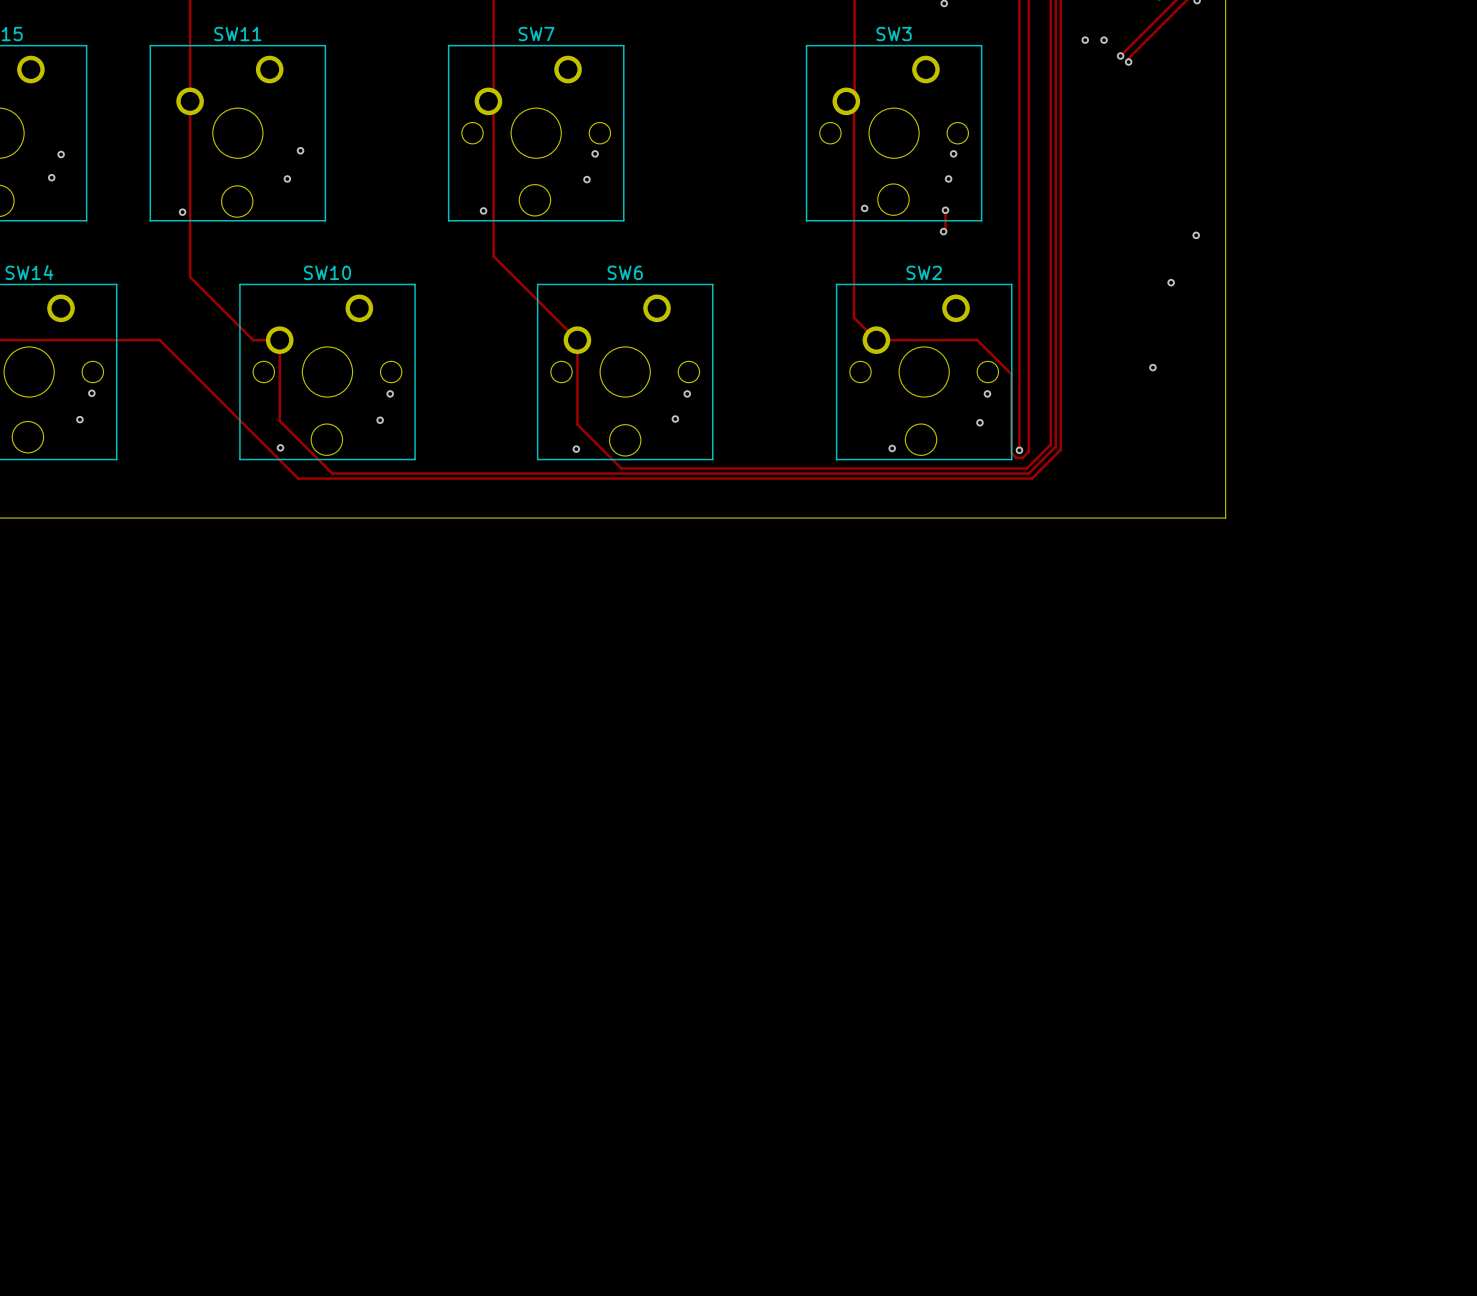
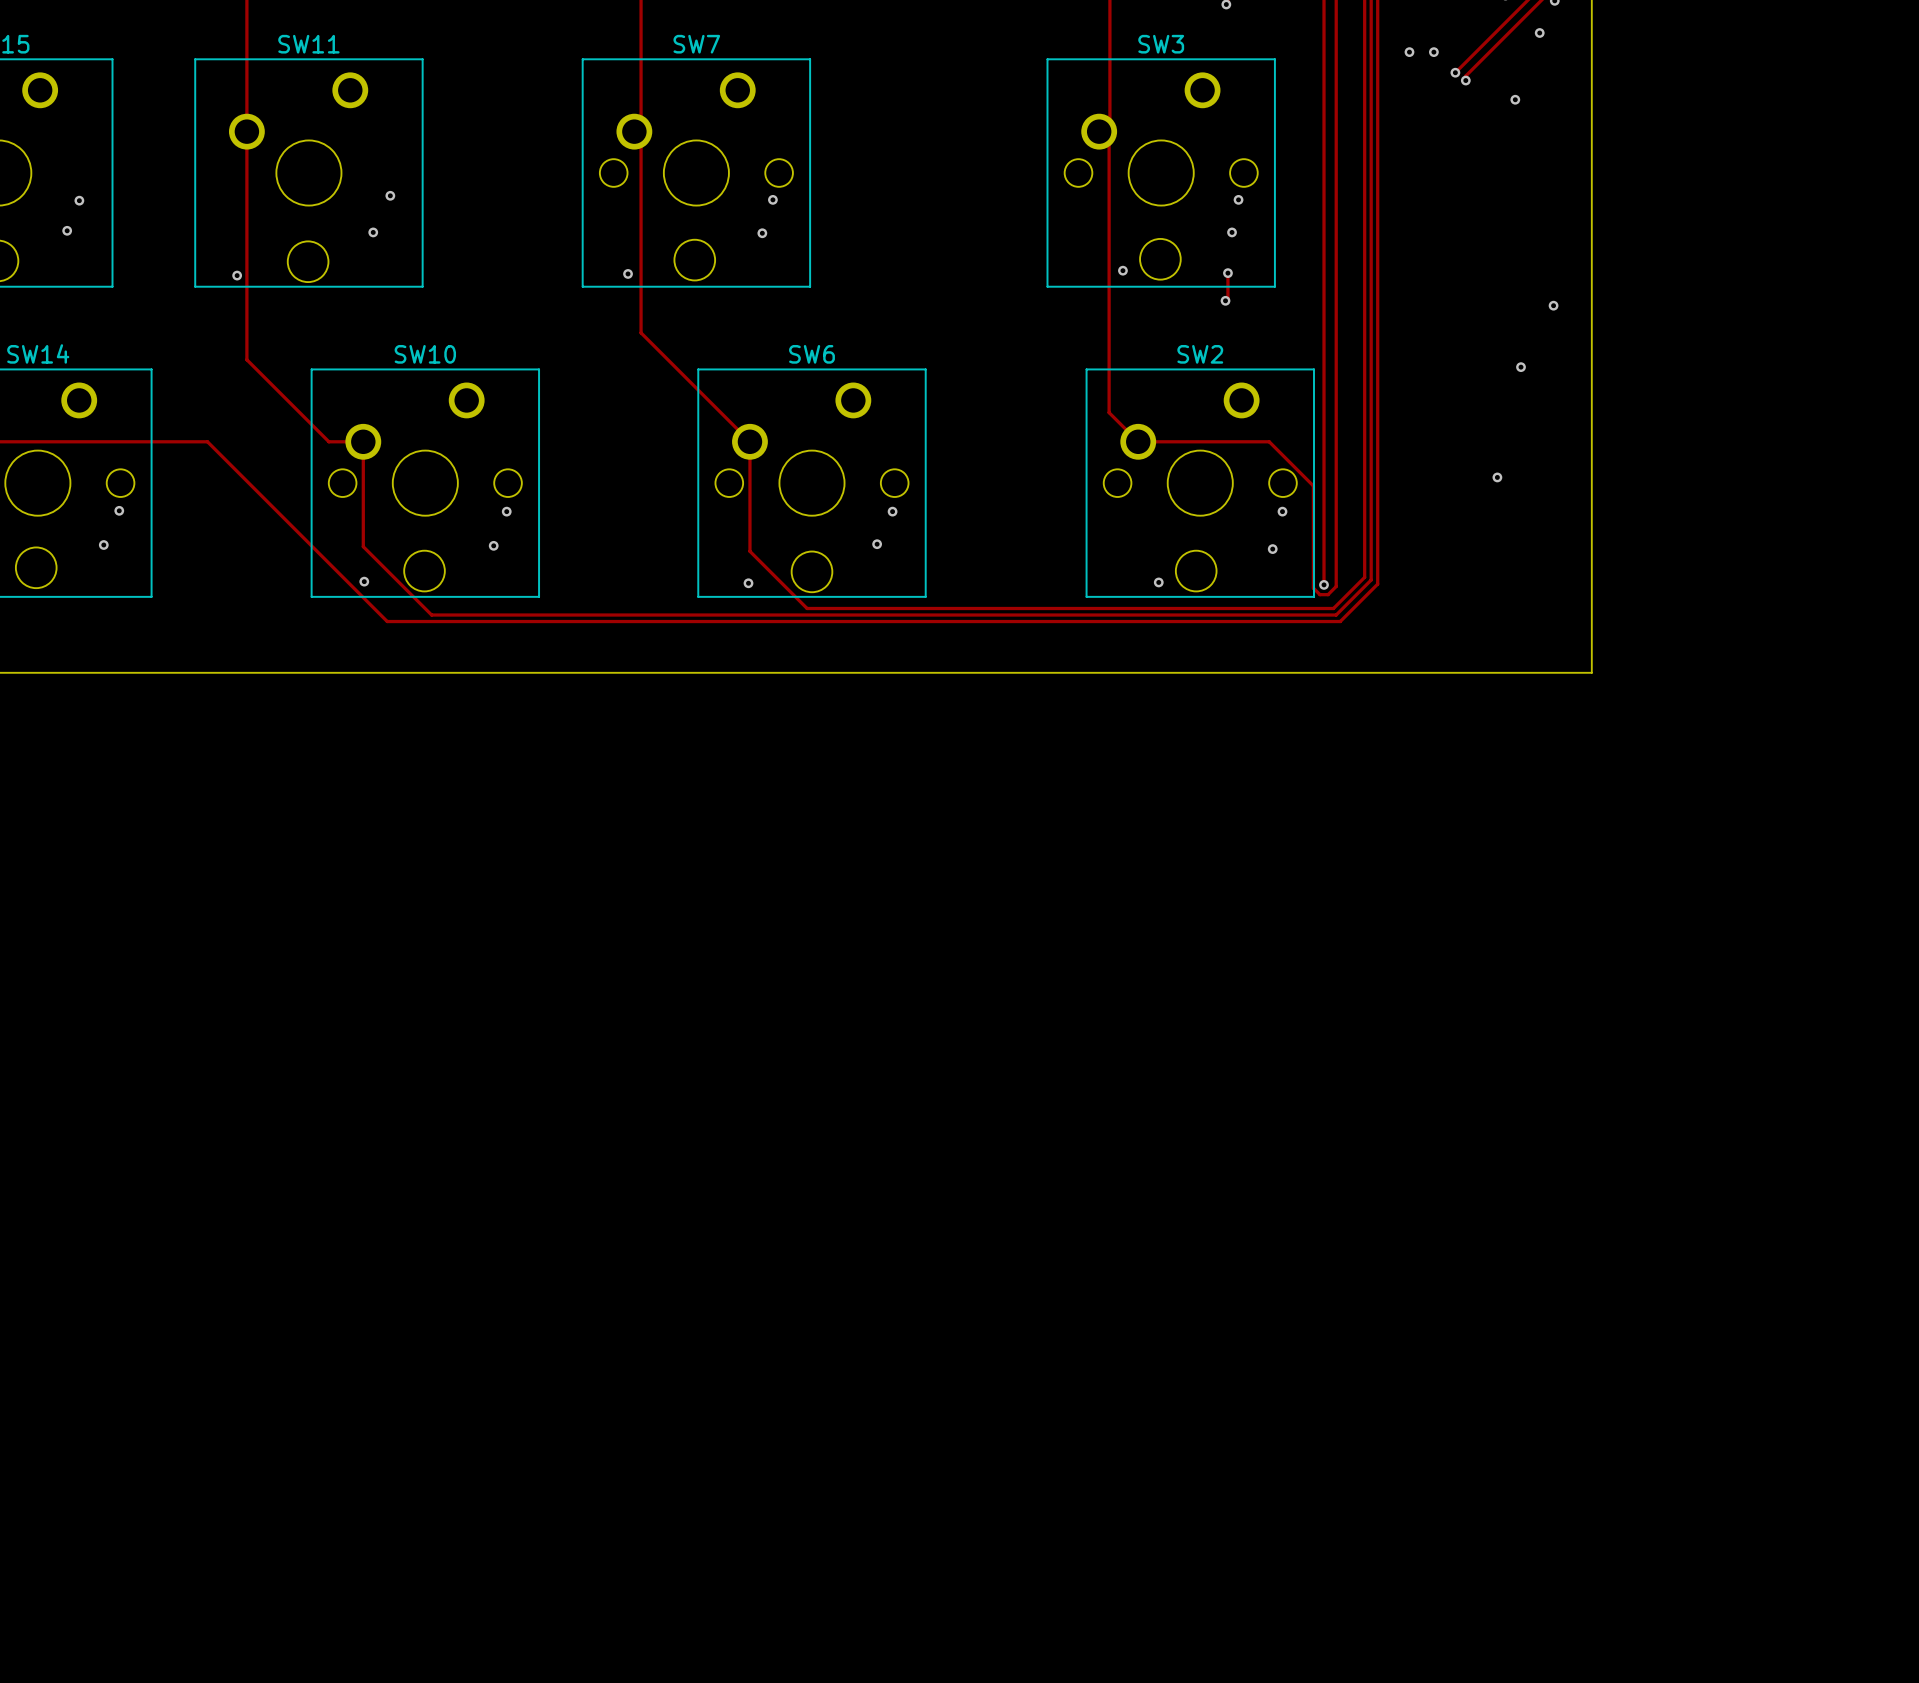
via: none -> (1539, 32)
via: none -> (1515, 99)

